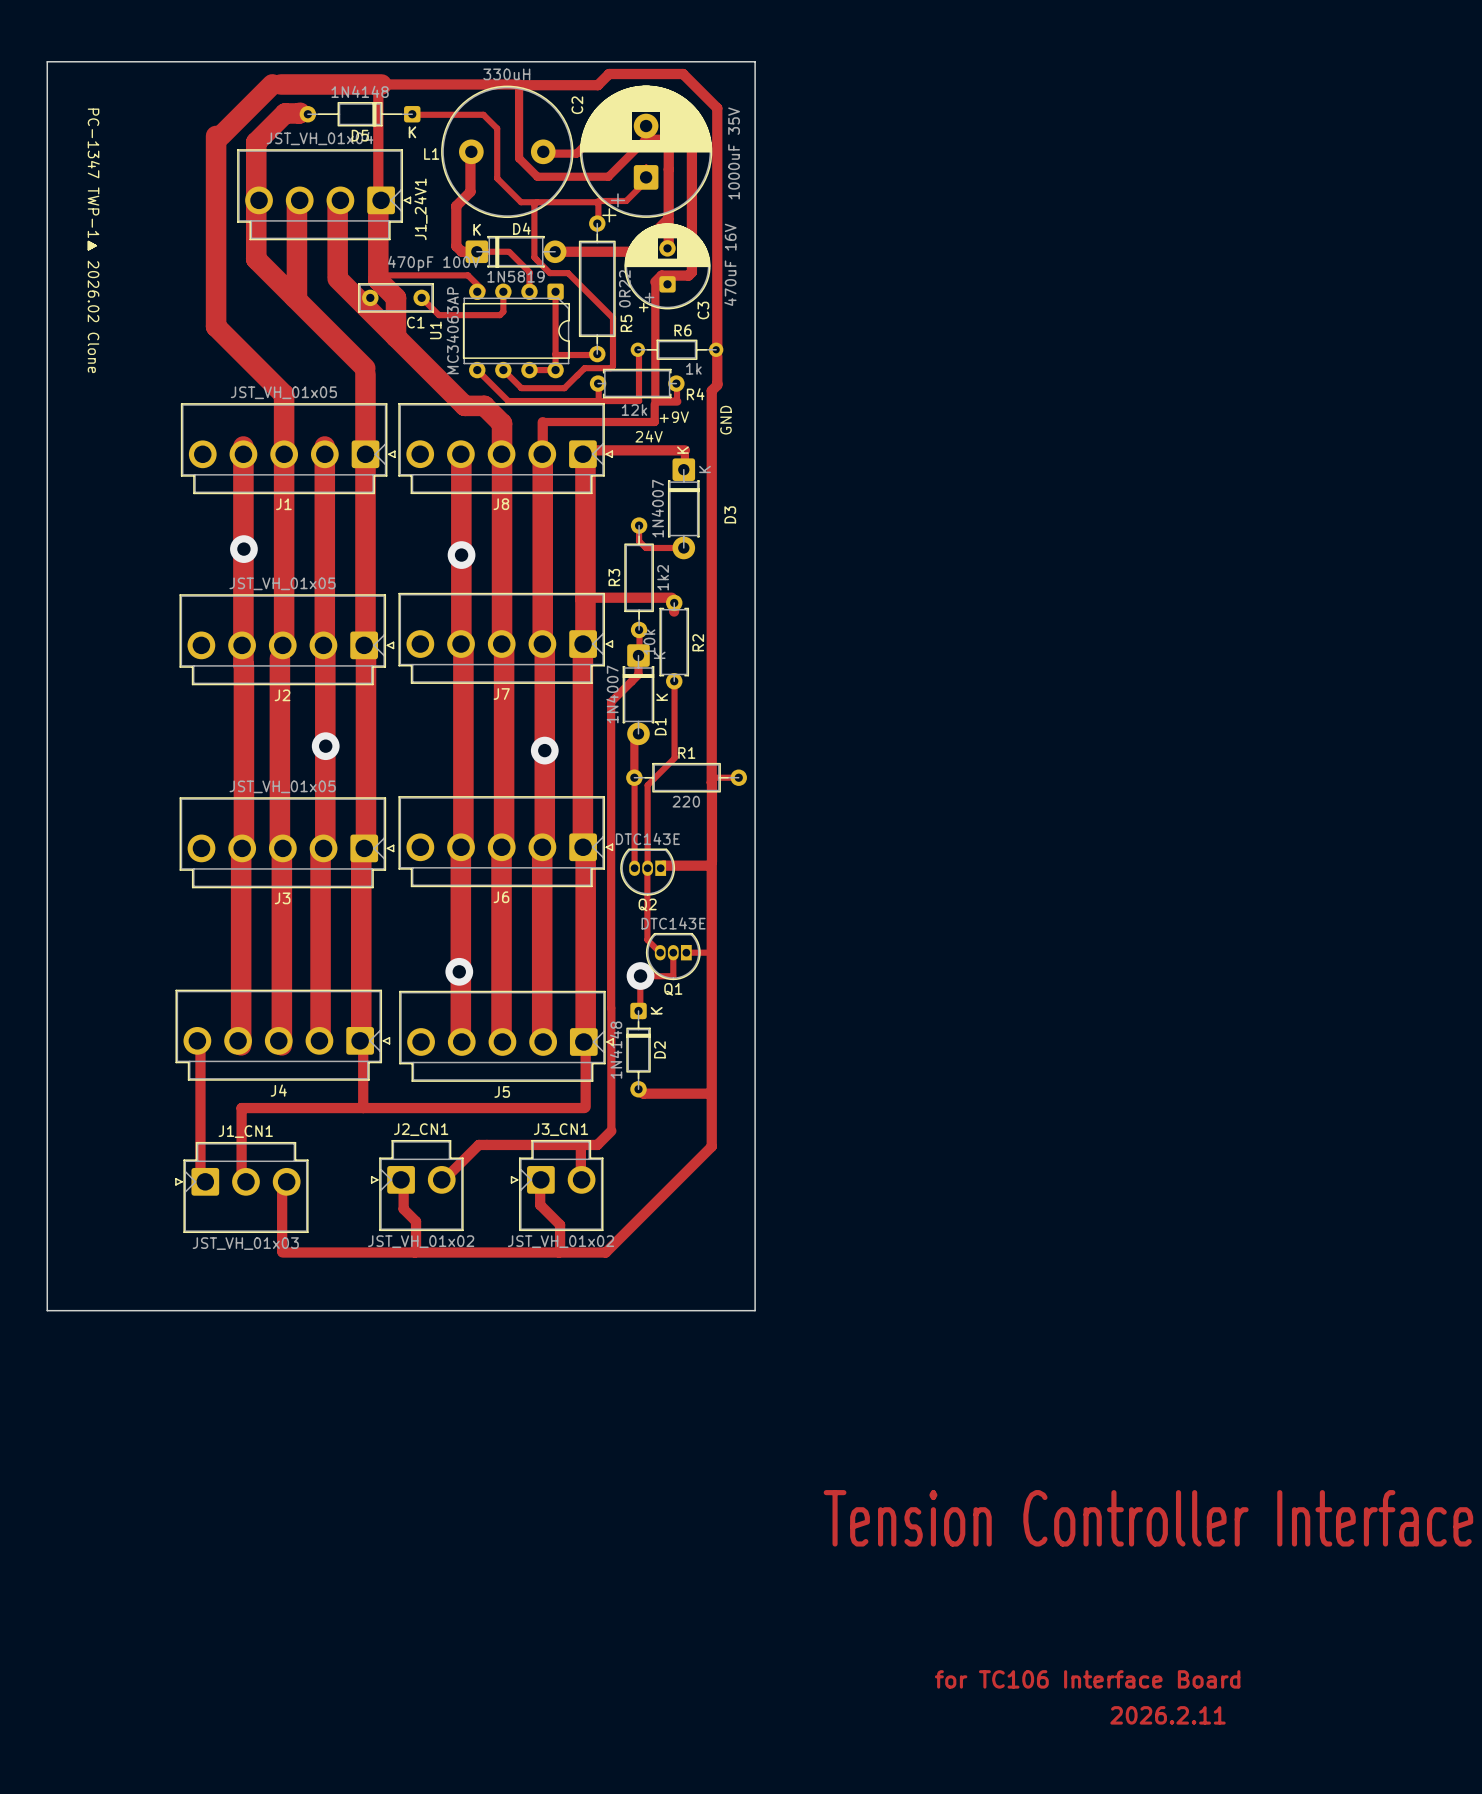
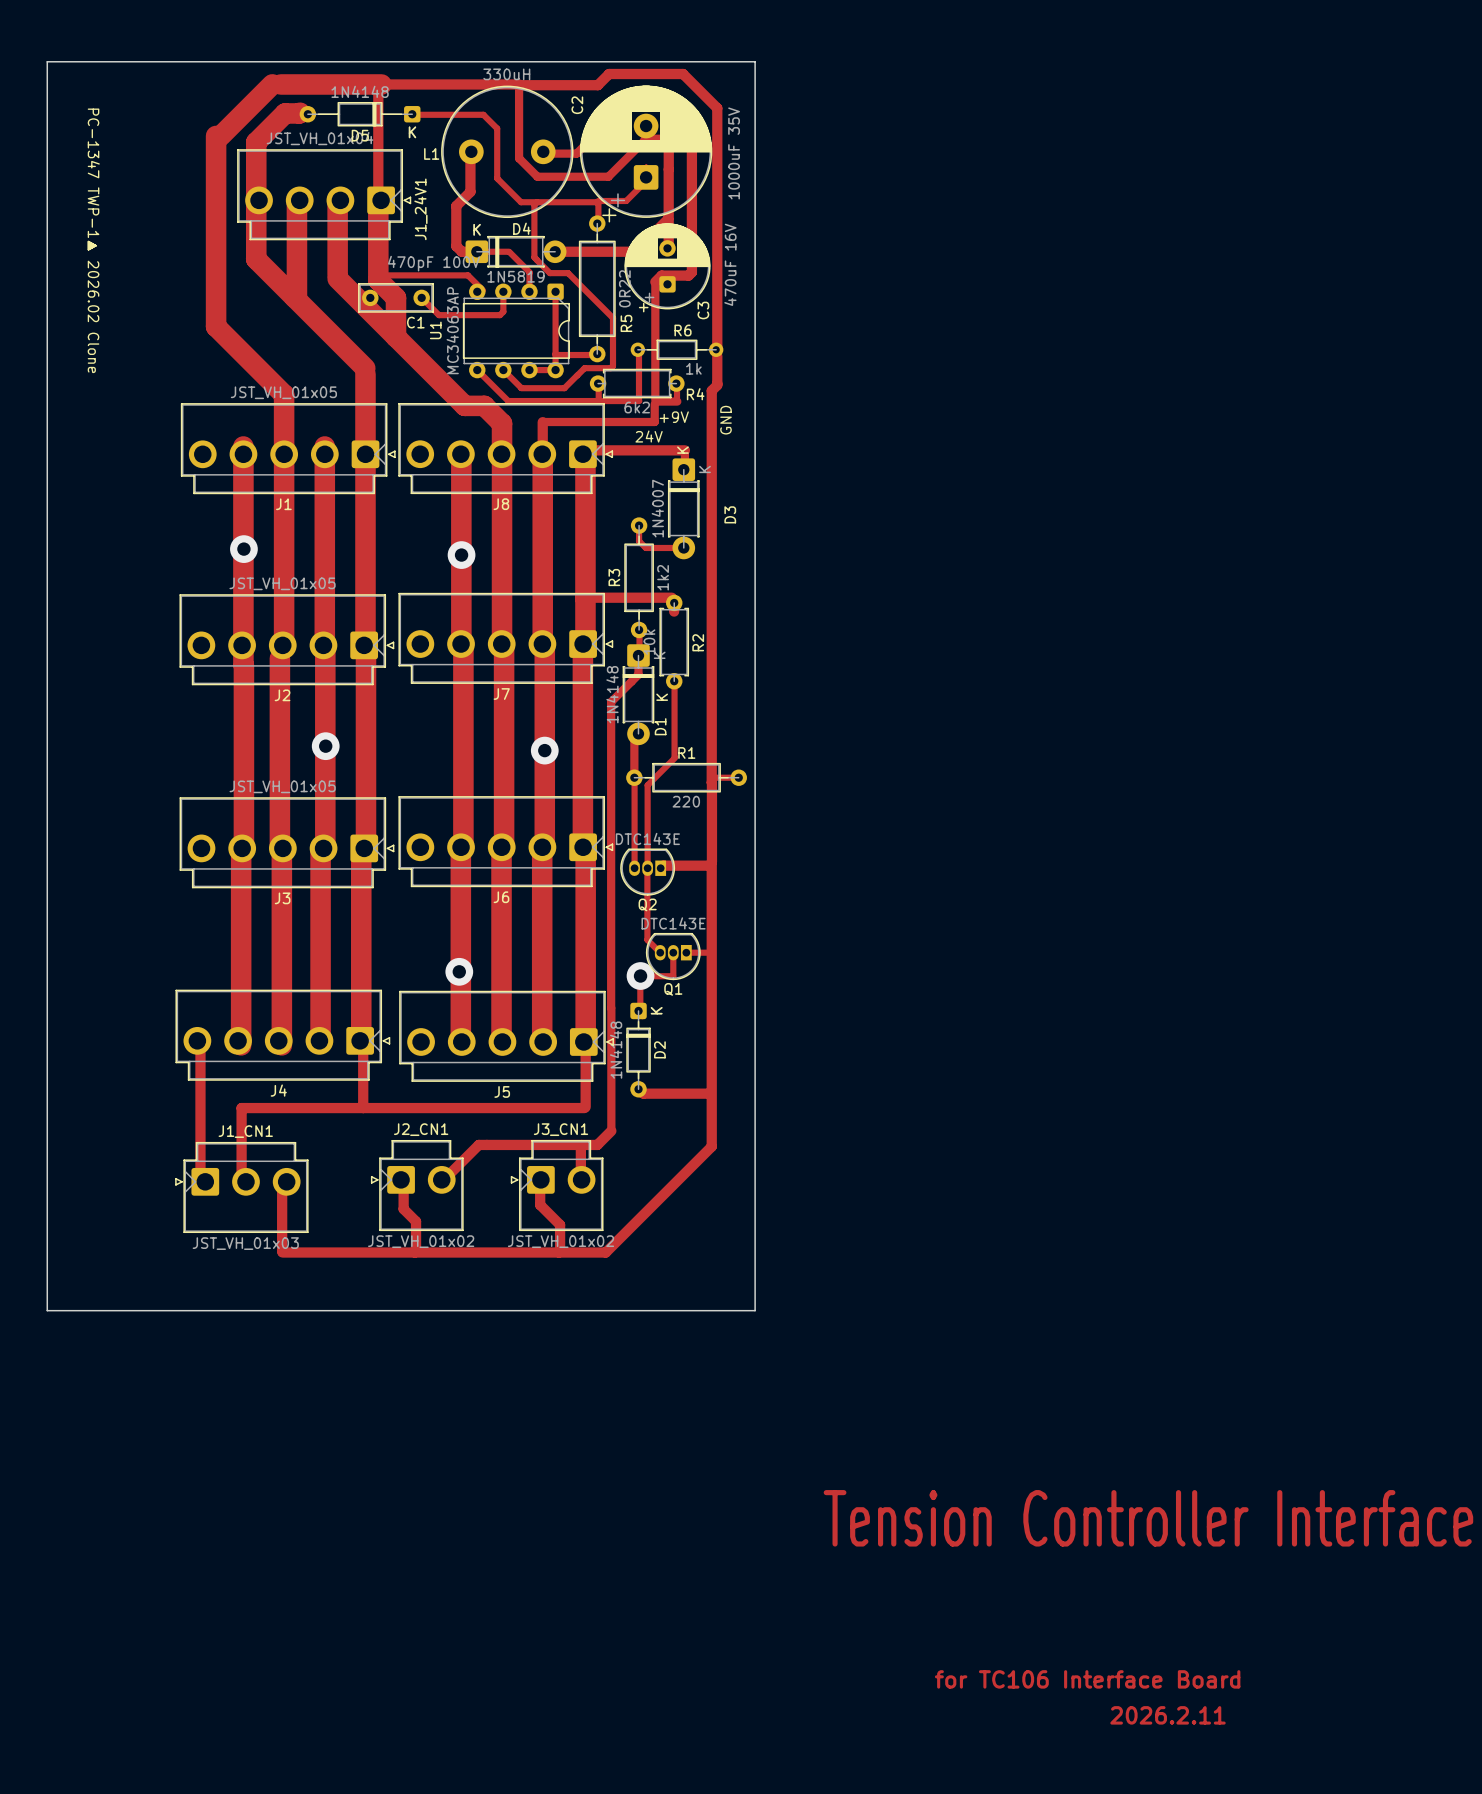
R4 value: 12k (634, 410) -> 6k2 (637, 407)
D1 value: 1N4007 (612, 694) -> 1N4148 (612, 694)

